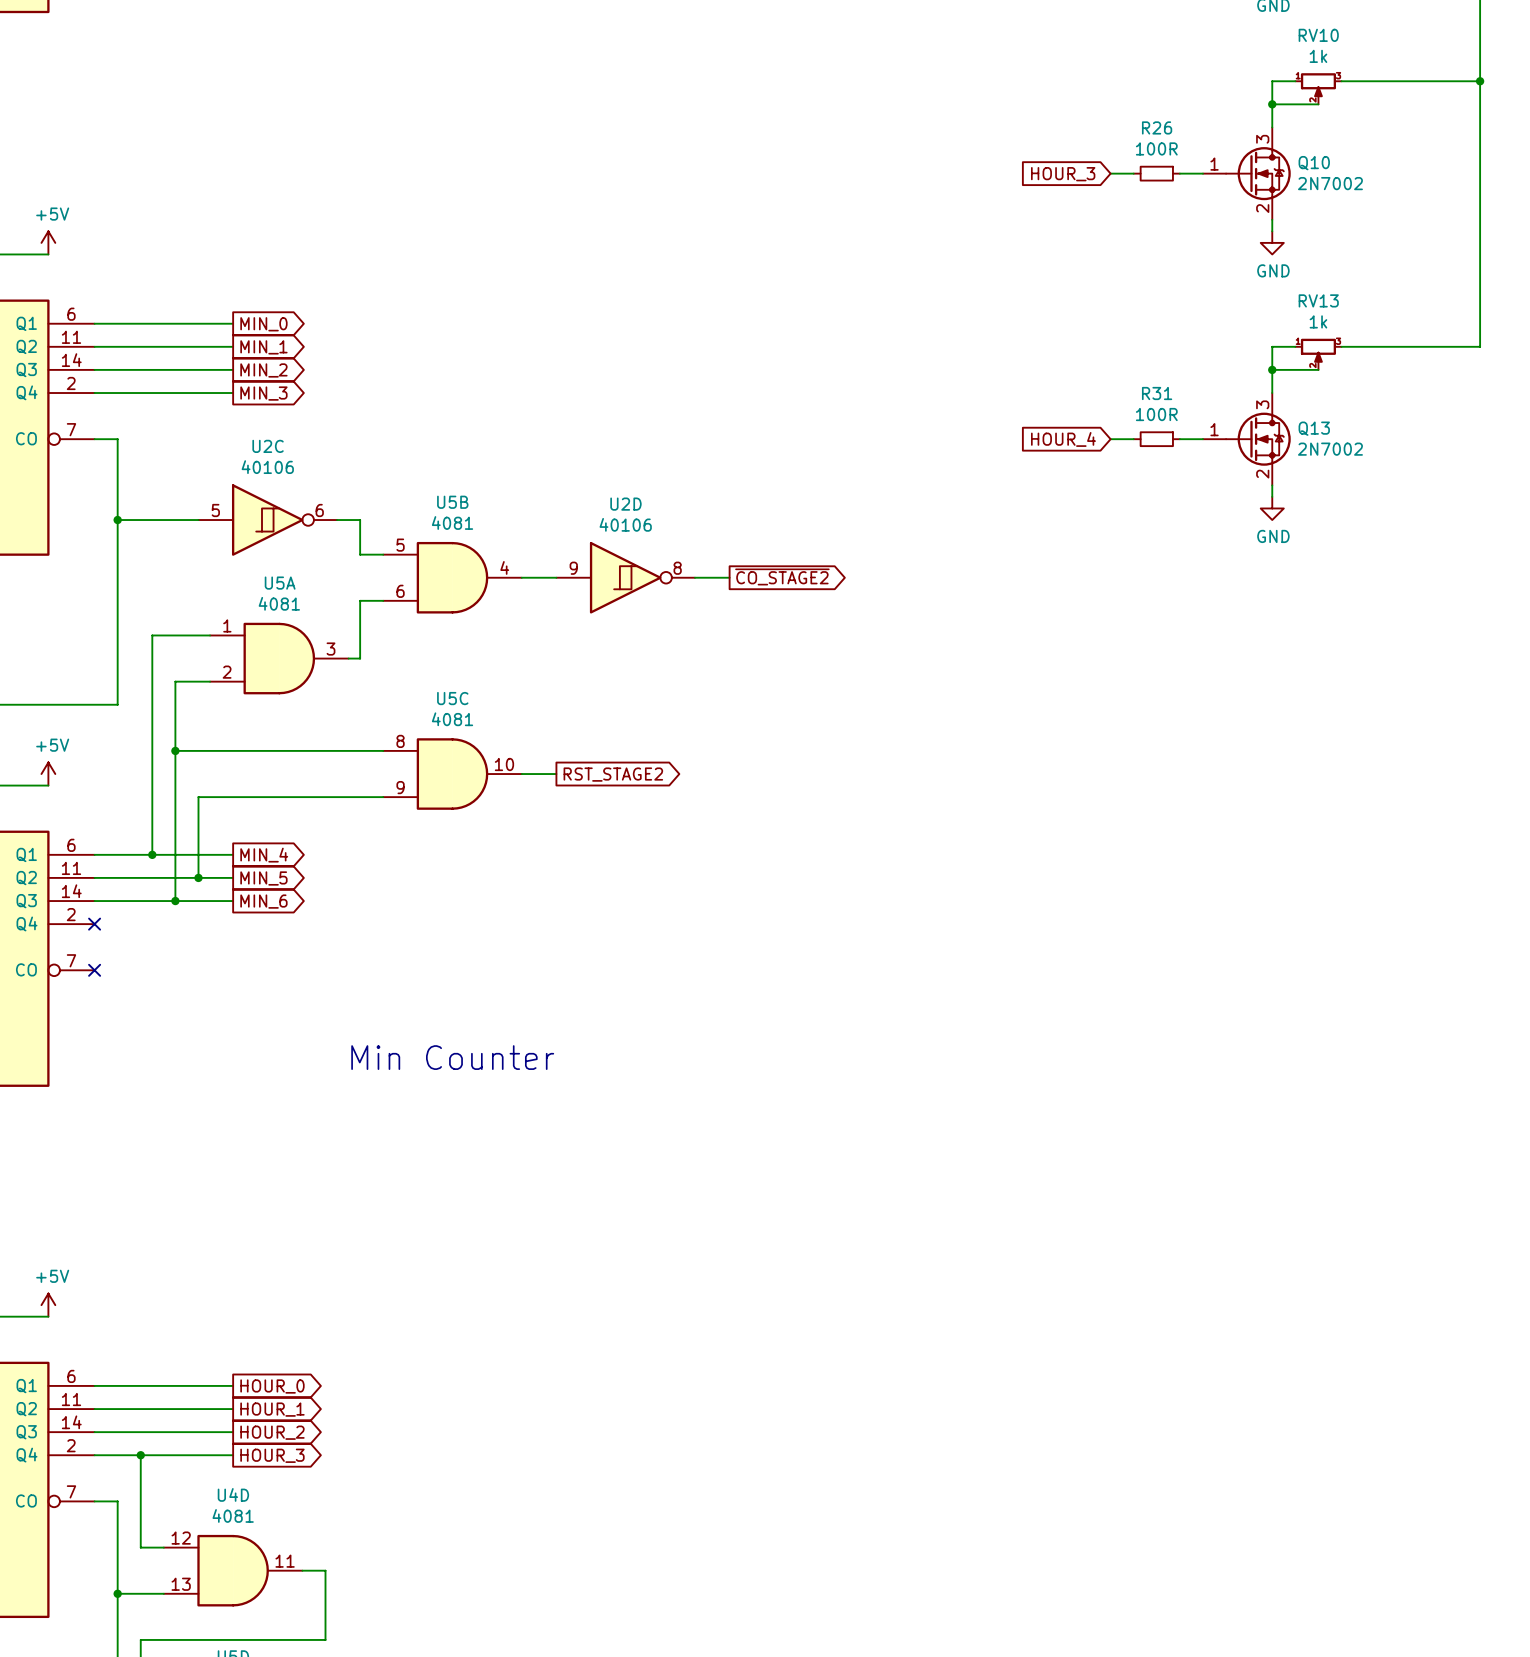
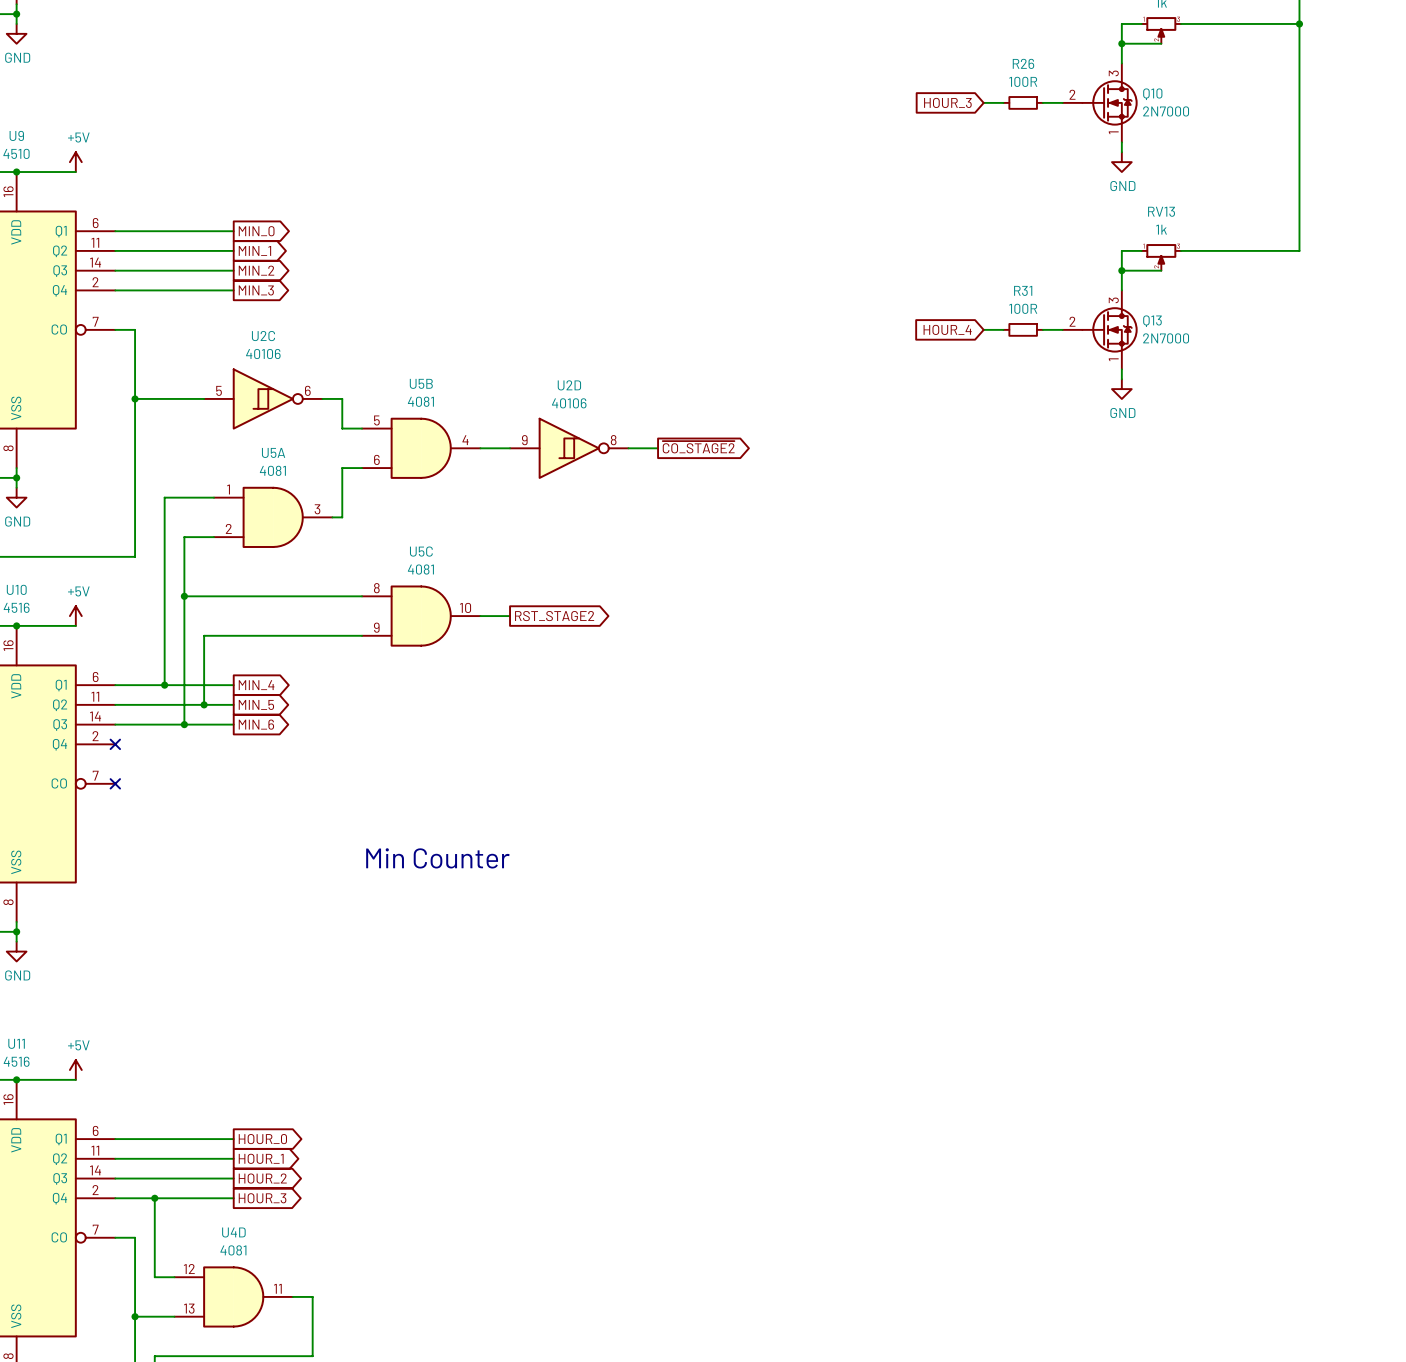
Q10 pin number: 1 (1214, 164) -> 2 (1072, 94)
Q10 value: 2N7002 (1330, 183) -> 2N7000 (1166, 111)
Q10 pin number: 2 (1262, 208) -> 1 (1113, 132)
Q13 pin number: 1 (1214, 429) -> 2 (1072, 321)
Q13 value: 2N7002 (1330, 449) -> 2N7000 (1166, 338)
Q13 pin number: 2 (1262, 474) -> 1 (1113, 359)

